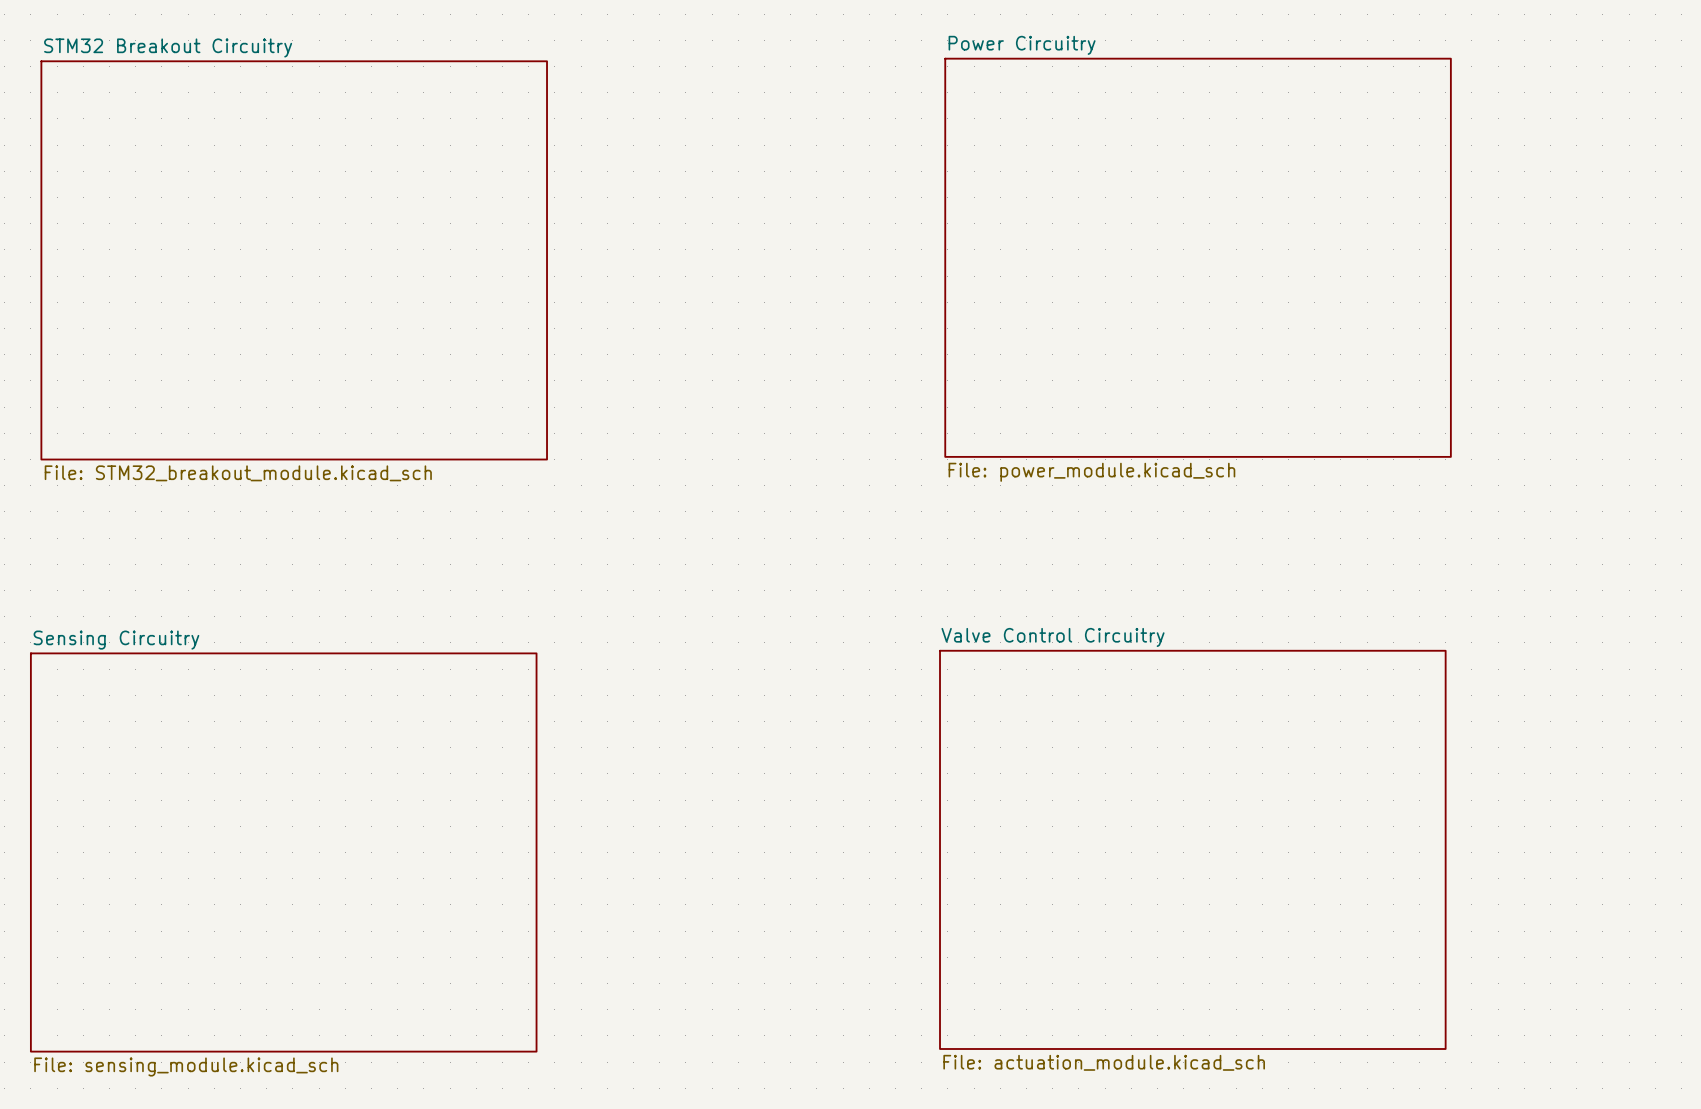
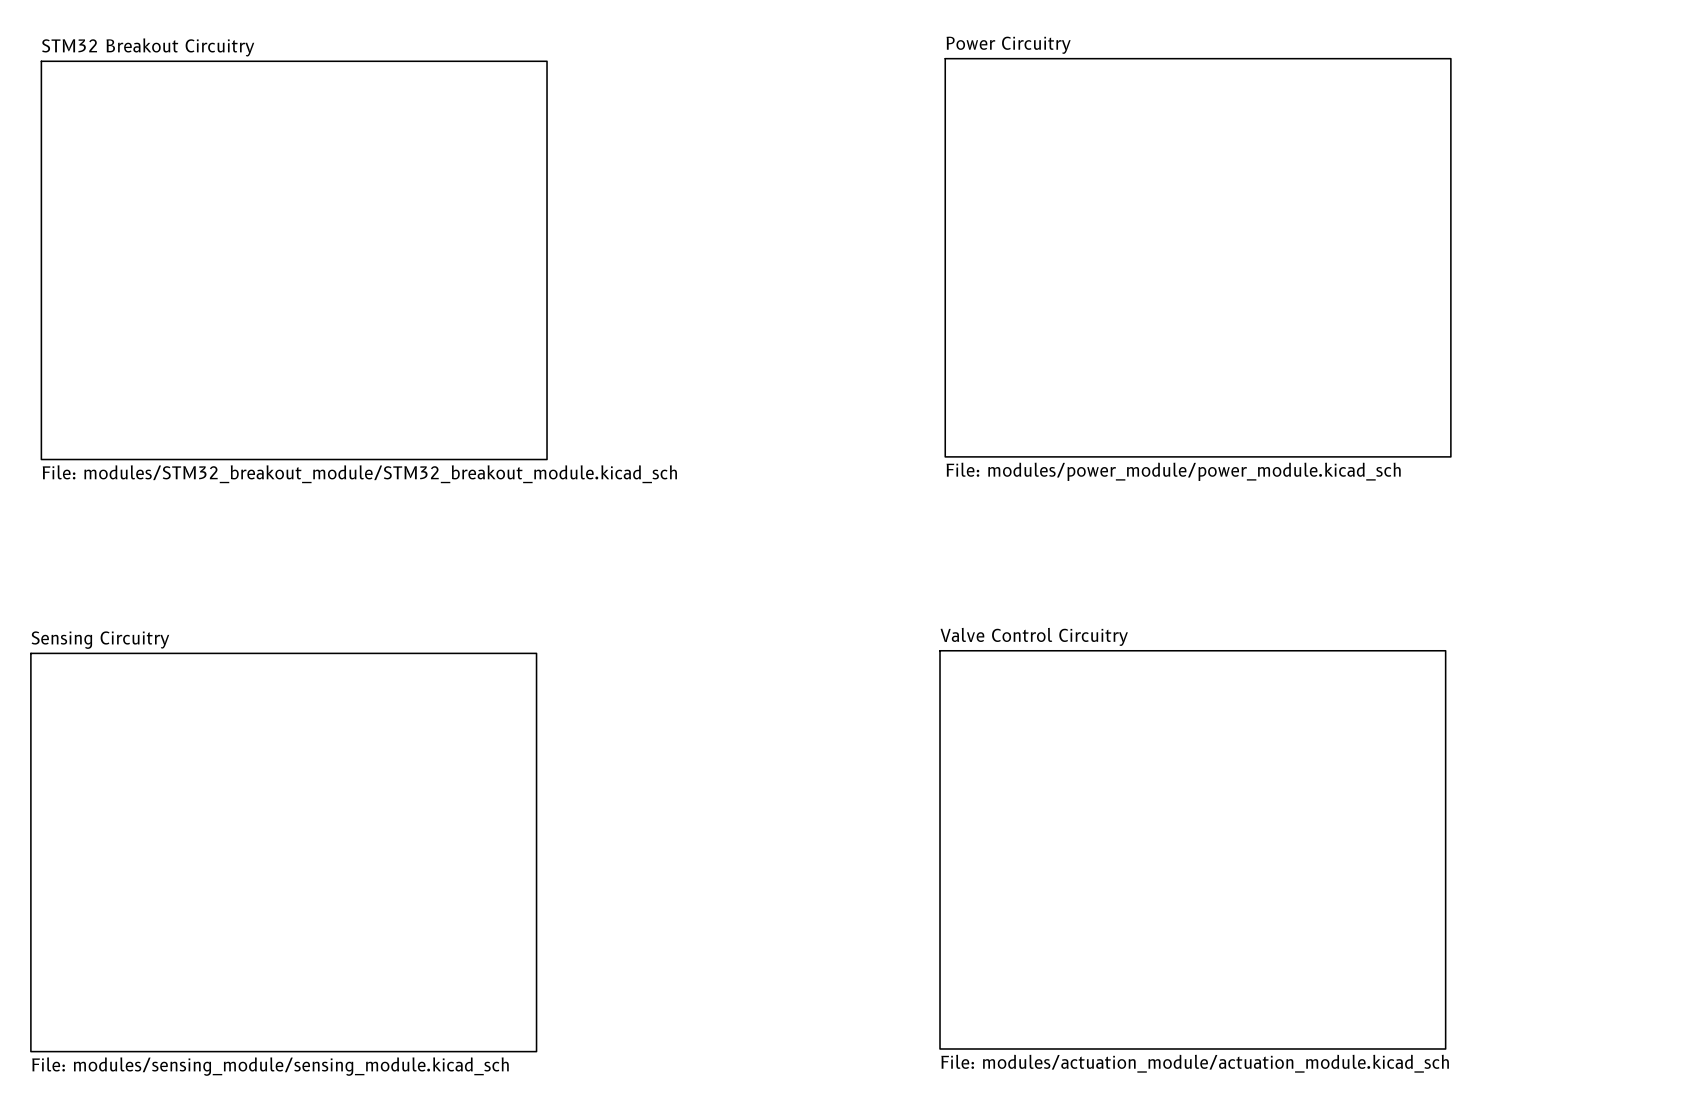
sheet Power Circuitry value: File: power_module.kicad_sch (1091, 472) -> File: modules/power_module/power_module.kicad_sch (1173, 471)
sheet STM32 Breakout Circuitry value: File: STM32_breakout_module.kicad_sch (238, 473) -> File: modules/STM32_breakout_module/STM32_breakout_module.kicad_sch (359, 474)
sheet Valve Control Circuitry value: File: actuation_module.kicad_sch (1104, 1062) -> File: modules/actuation_module/actuation_module.kicad_sch (1195, 1063)
sheet Sensing Circuitry value: File: sensing_module.kicad_sch (186, 1067) -> File: modules/sensing_module/sensing_module.kicad_sch (270, 1066)

